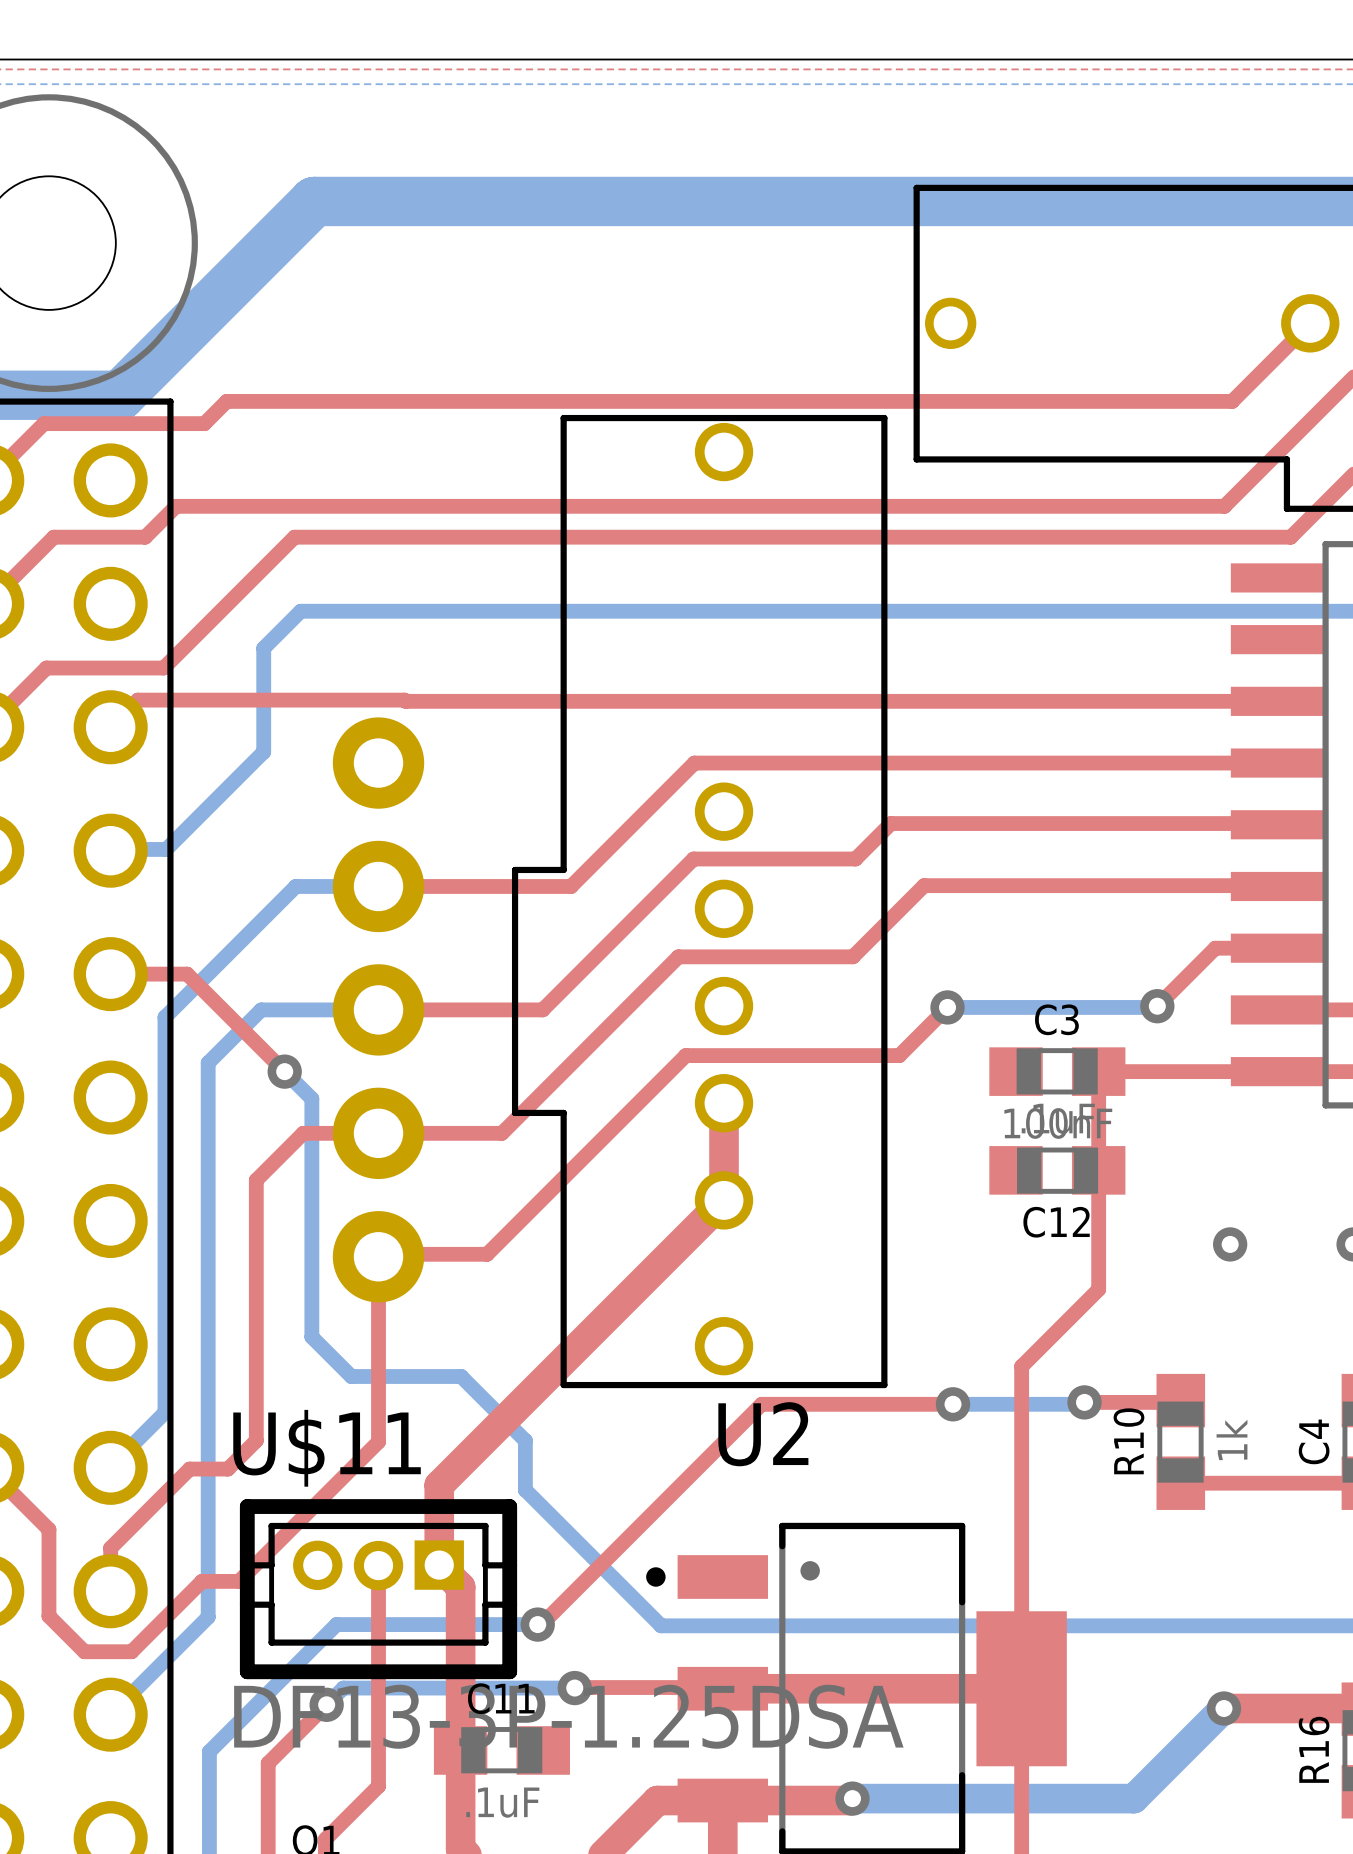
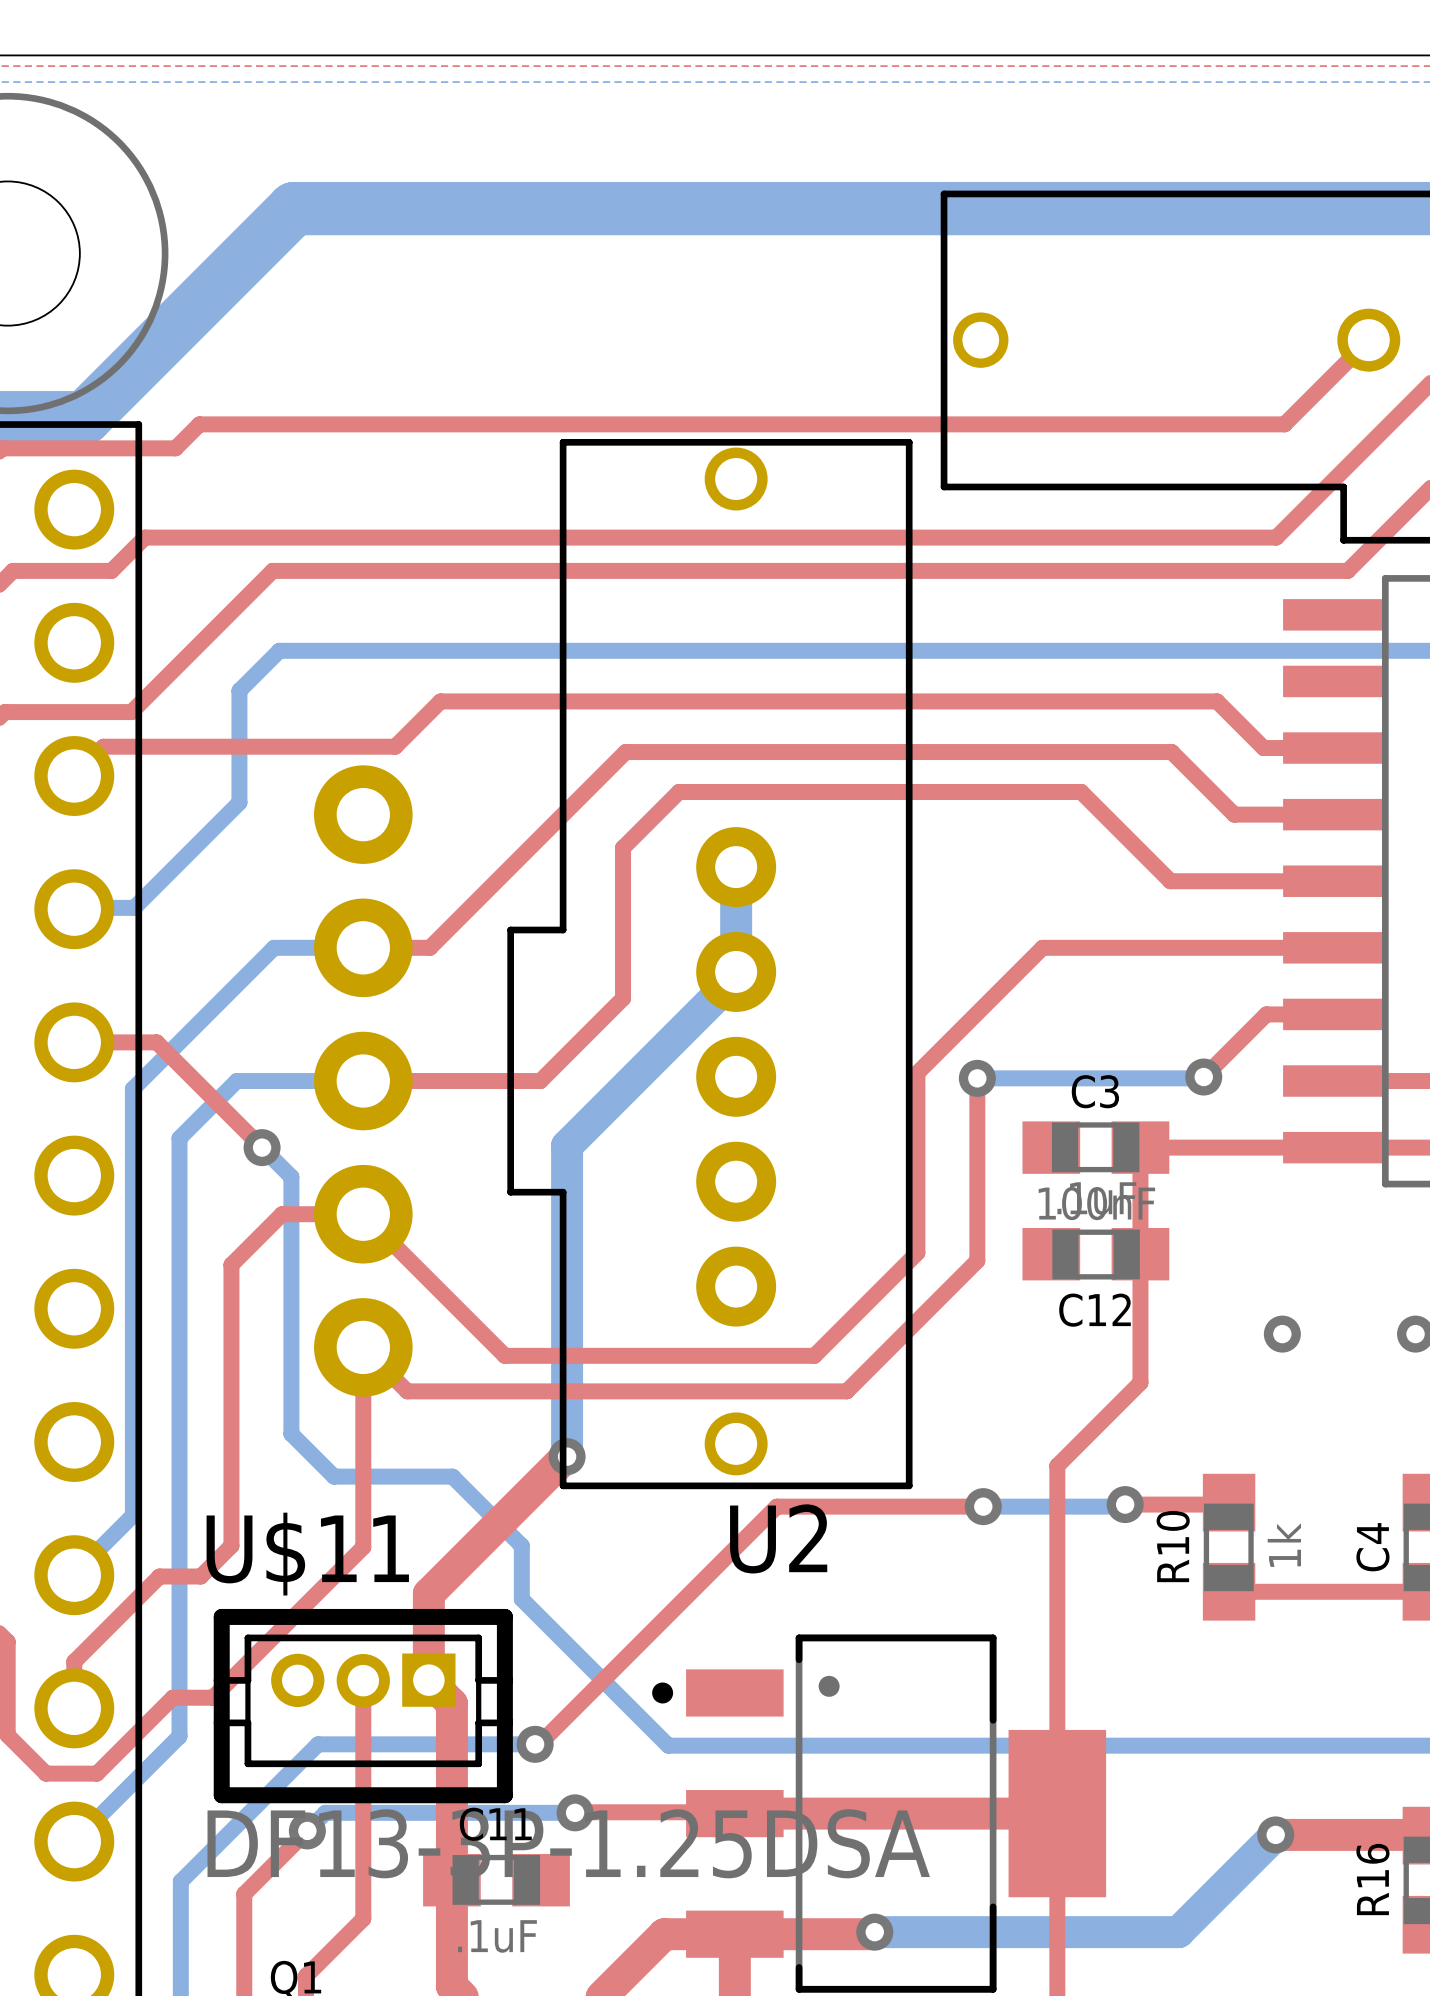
part footprint: [511, 414, 888, 1389] -> [507, 438, 913, 1490]
top track: (404, 700) (1212, 701) -> (391, 746) (395, 746) (440, 701) (1217, 701) (1263, 748)
top track: (1185, 763) (694, 763) (571, 886) (440, 886) -> (1234, 814) (1171, 752) (625, 752) (429, 947)
bottom track: none -> (736, 867) (736, 976) (567, 1145) (567, 1456)
top track: (1278, 823) (891, 823) (855, 859) (693, 859) (619, 933) -> (1335, 881) (1170, 881) (1081, 791) (678, 791) (623, 847) (623, 998)
top track: (1278, 885) (924, 885) (852, 956) (678, 956) (501, 1133) (378, 1133) -> (1335, 947) (1042, 947) (917, 1073) (917, 1252) (814, 1355) (504, 1355) (363, 1214)
top track: (947, 1007) (899, 1055) (685, 1055) (487, 1254) (380, 1254) (378, 1256) -> (977, 1078) (977, 1260) (846, 1391) (407, 1391) (363, 1347)
top track: (724, 1103) (724, 1200) (566, 1357) -> none
via: none -> (567, 1456)

